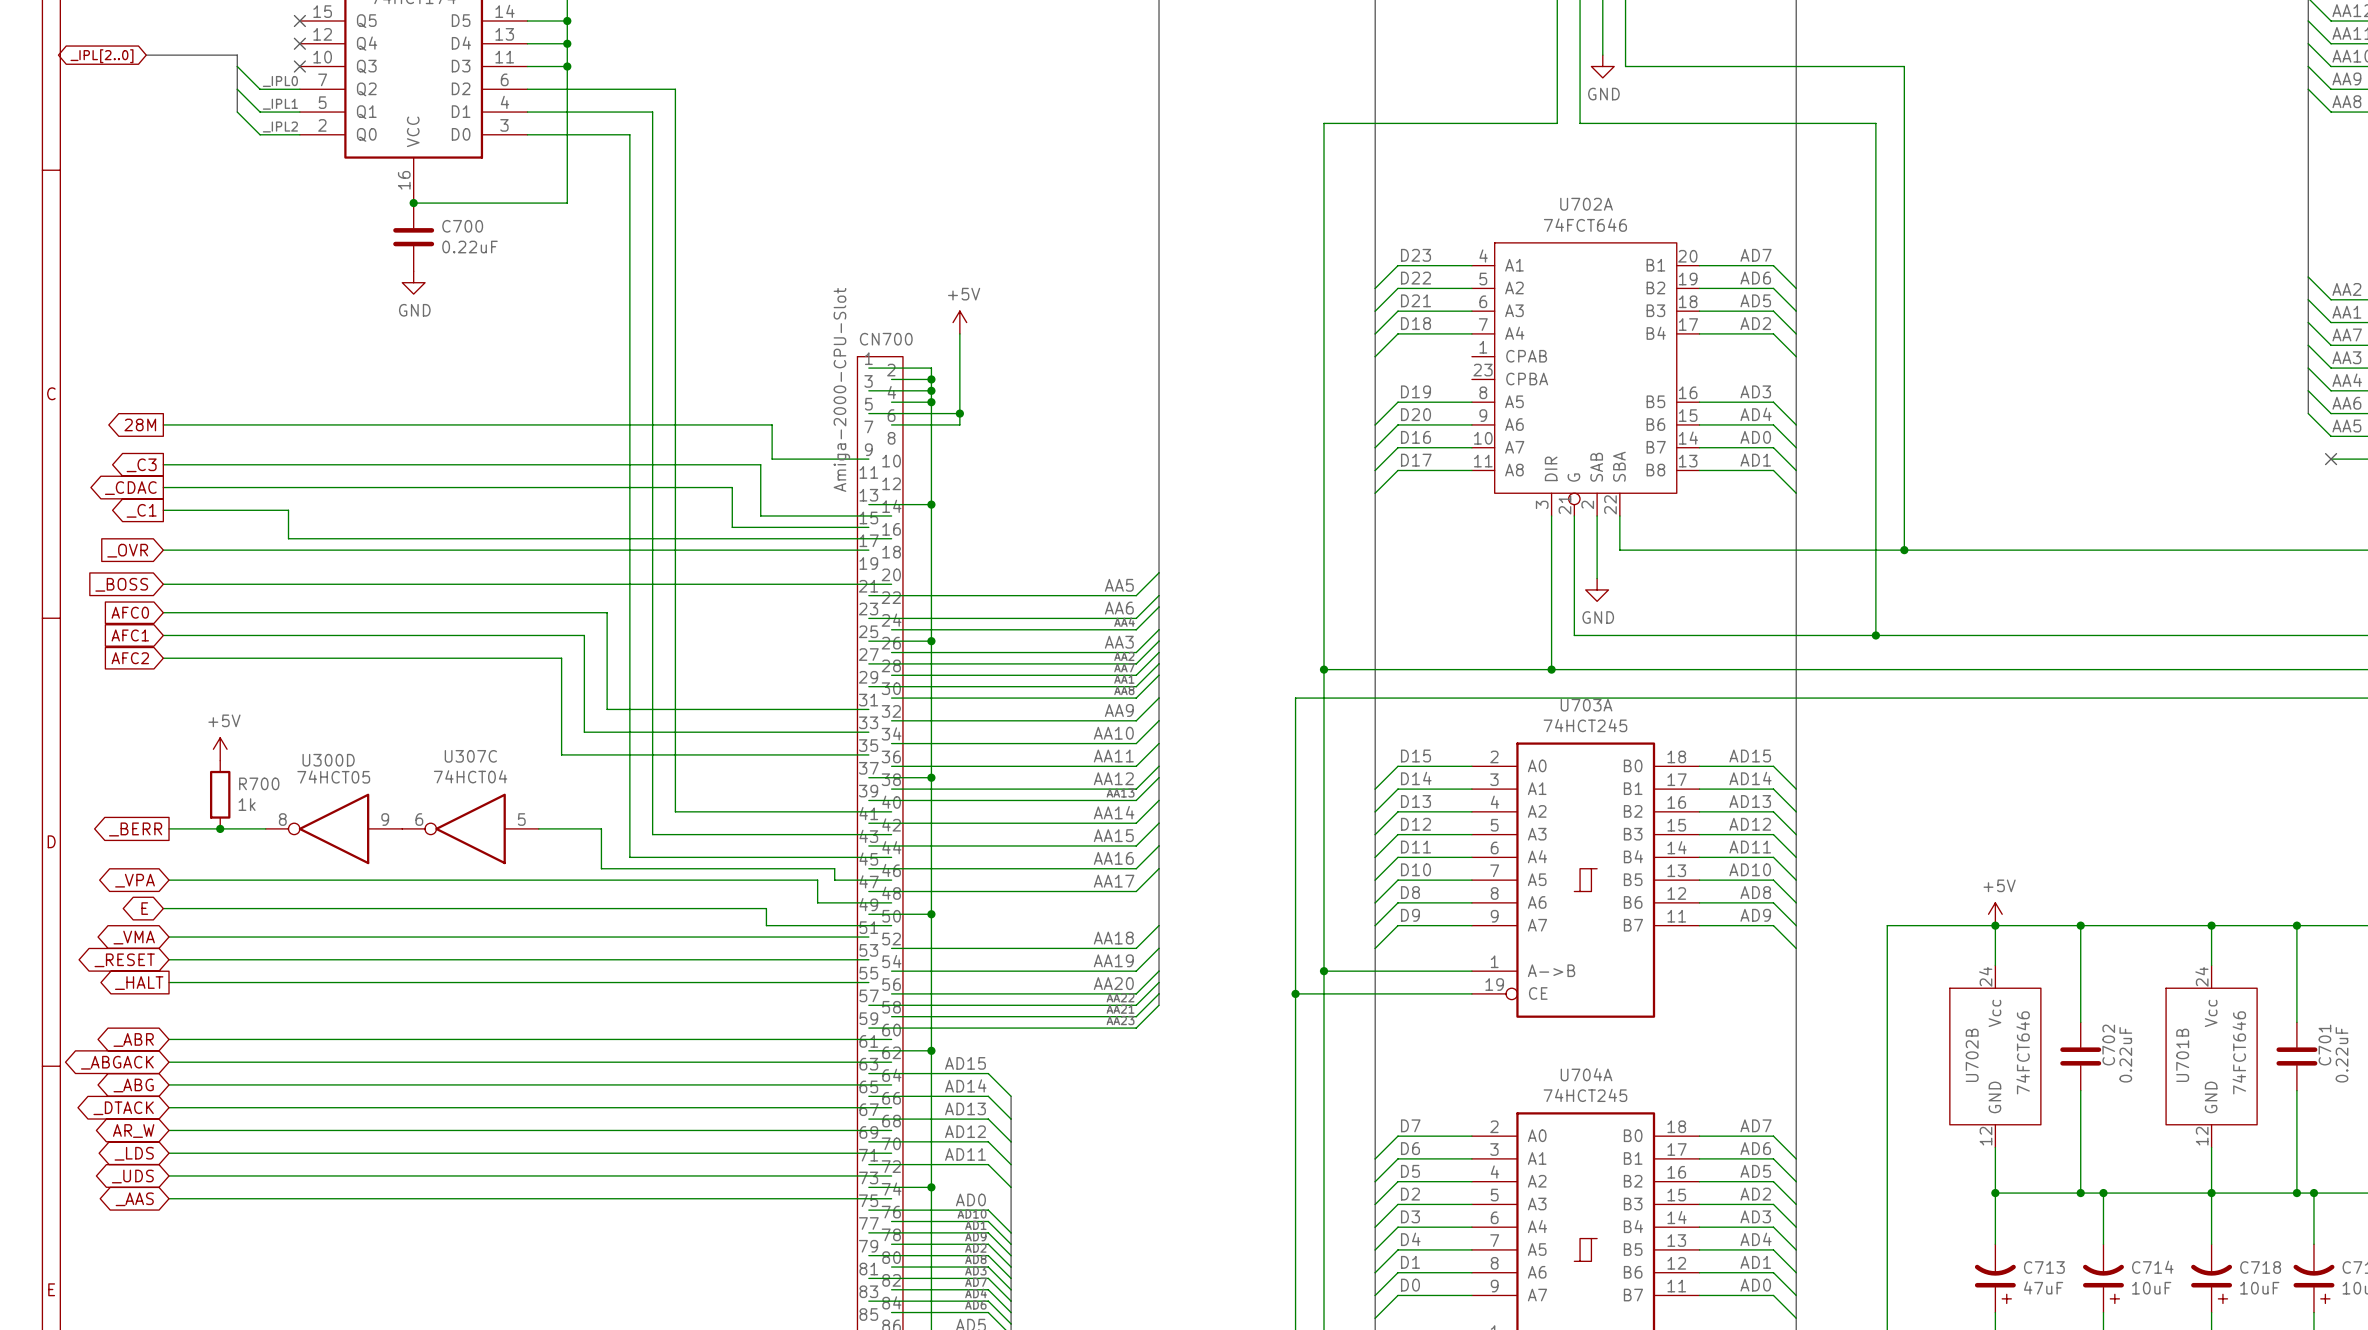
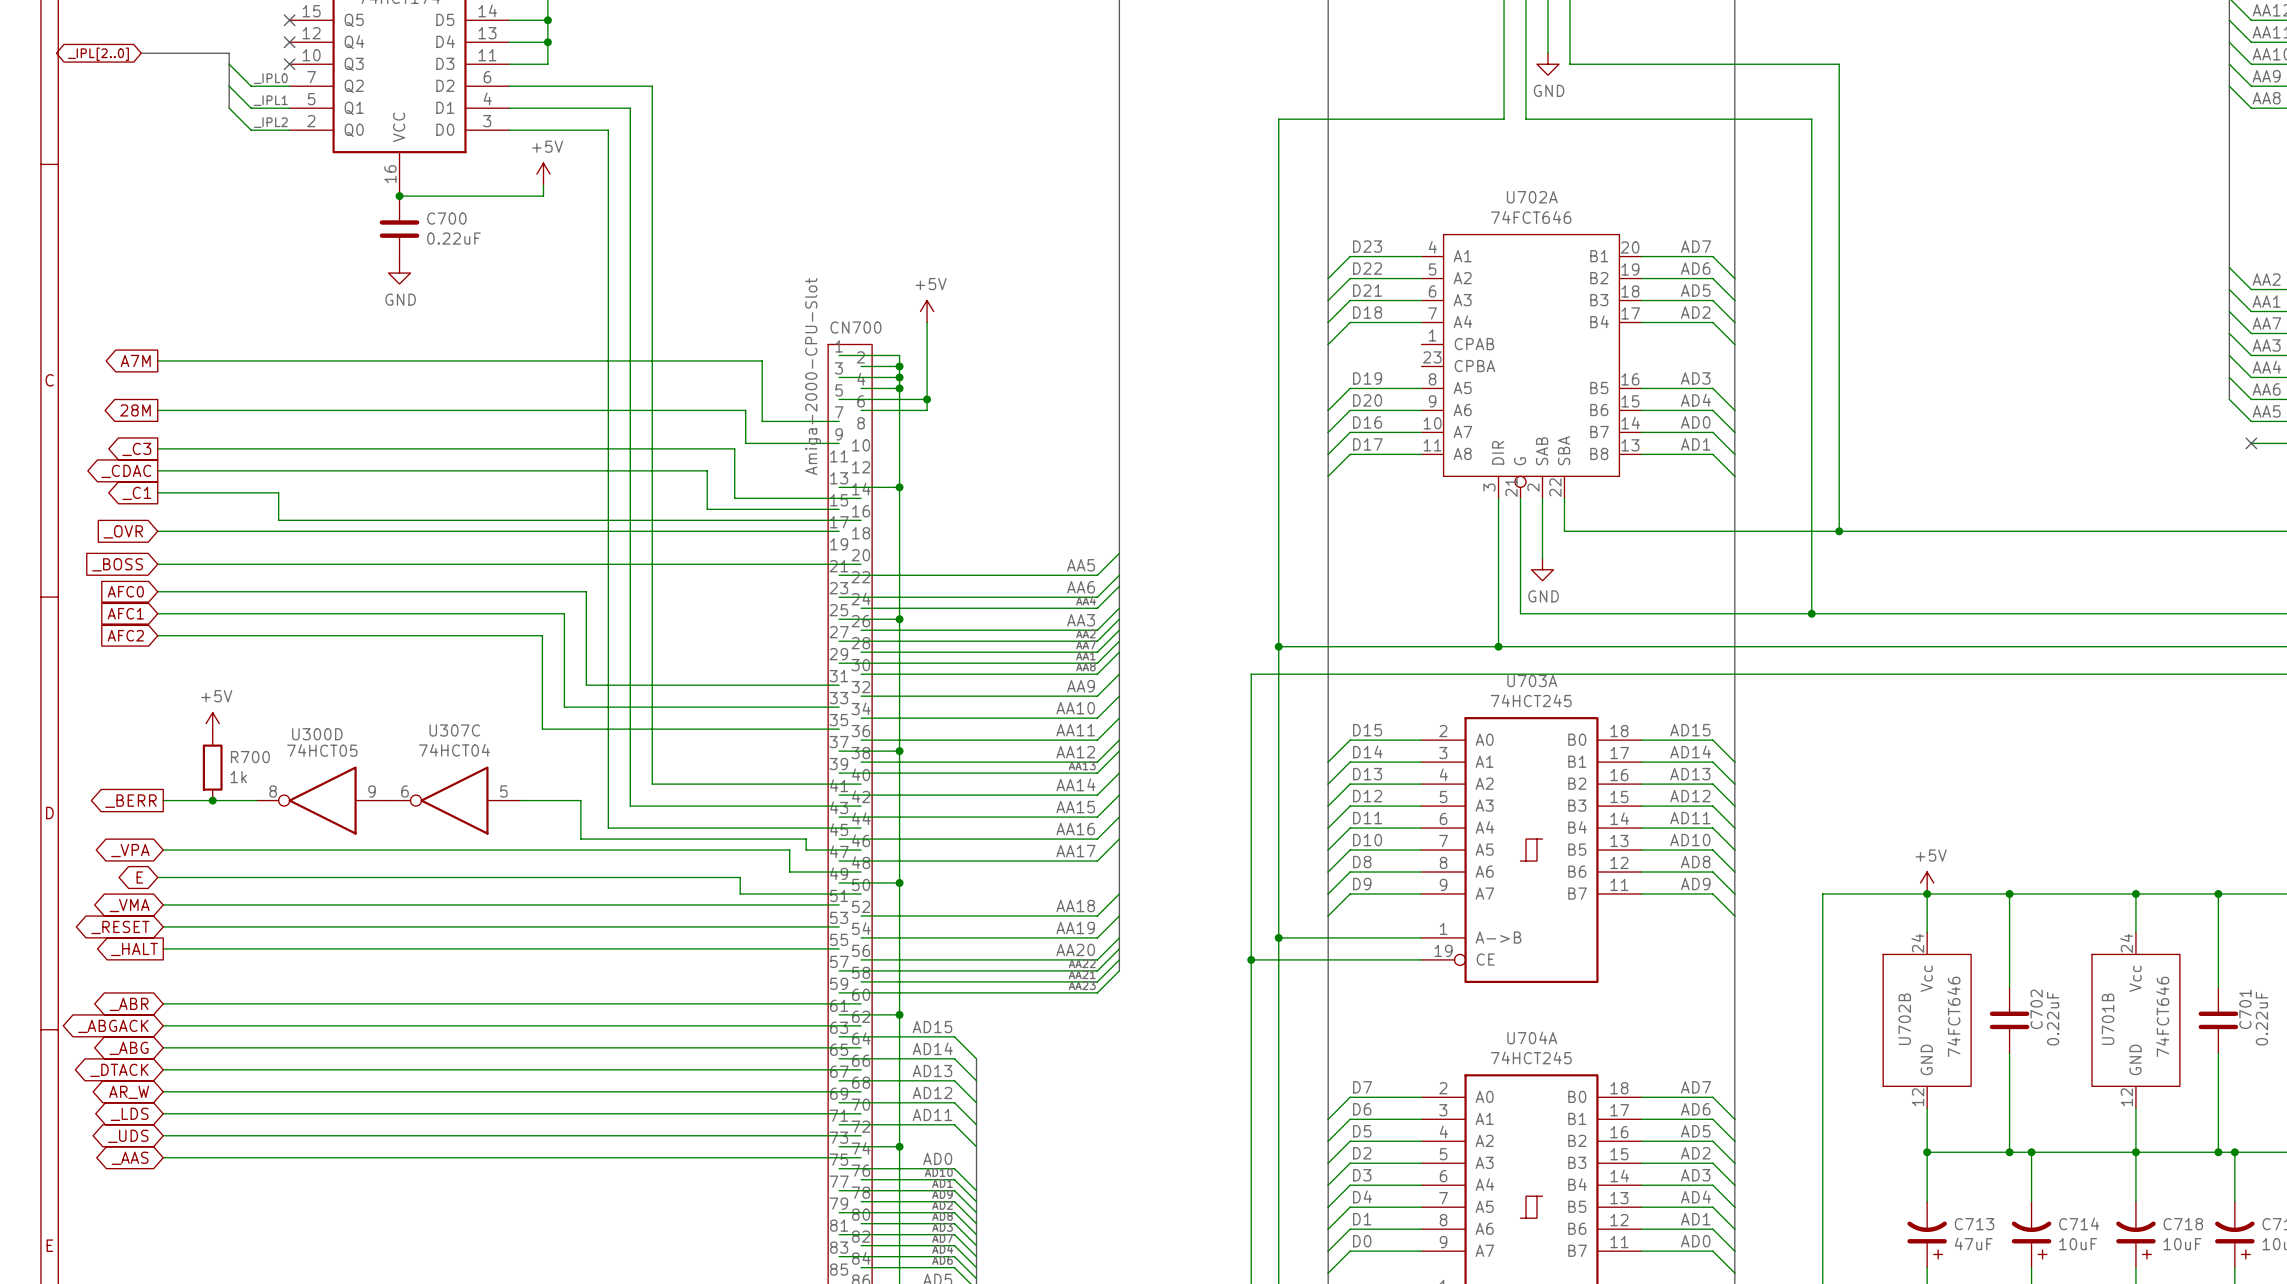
wire: (567, 66) (567, 203) (562, 203) -> (543, 185) (543, 196)
junction: (567, 66) -> none
power symbol: none -> +5V (543, 174)
global label: none -> A7M (135, 360)
wire: none -> (157, 360) (762, 360) (762, 421) (839, 421)

